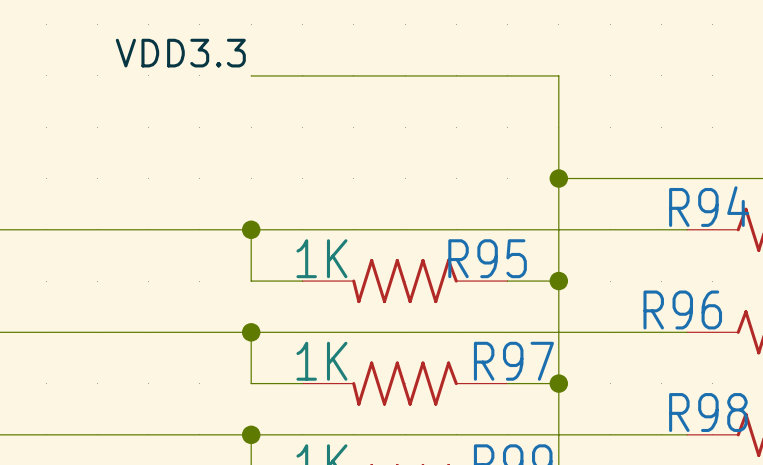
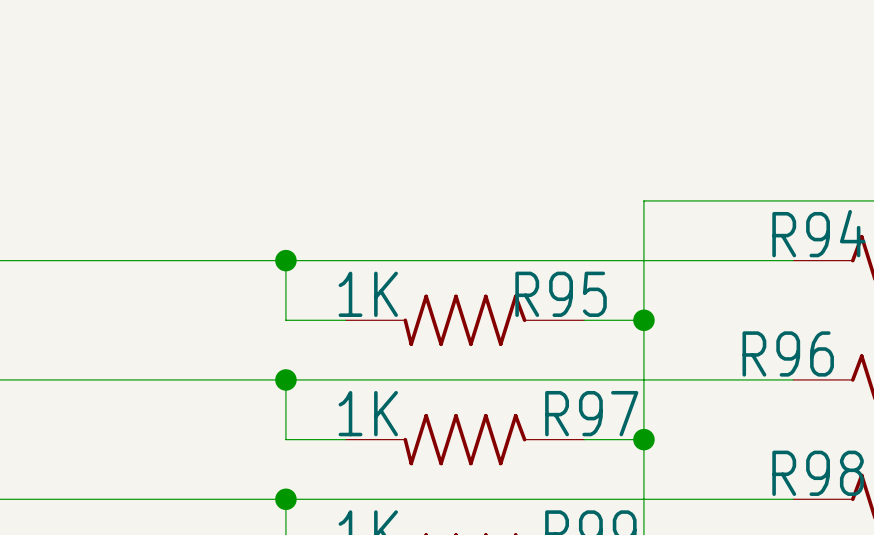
label: VDD3.3 (180, 53) -> none
wire: (251, 75) (558, 75) (558, 178) -> none
junction: (558, 178) -> none

